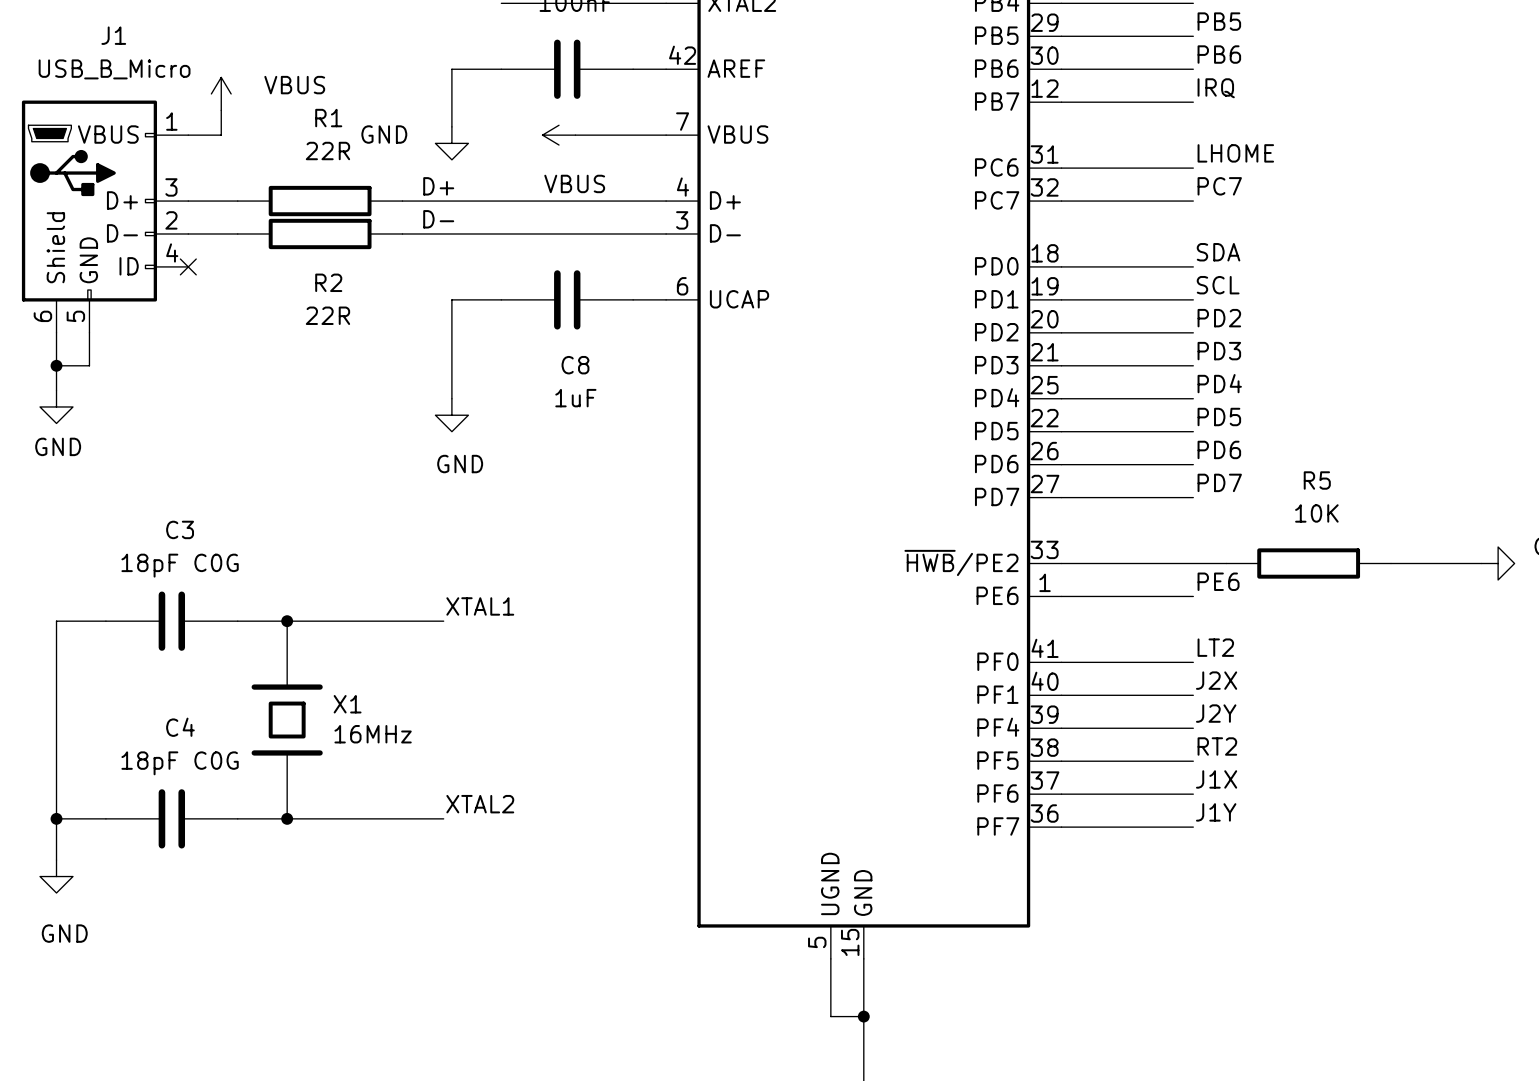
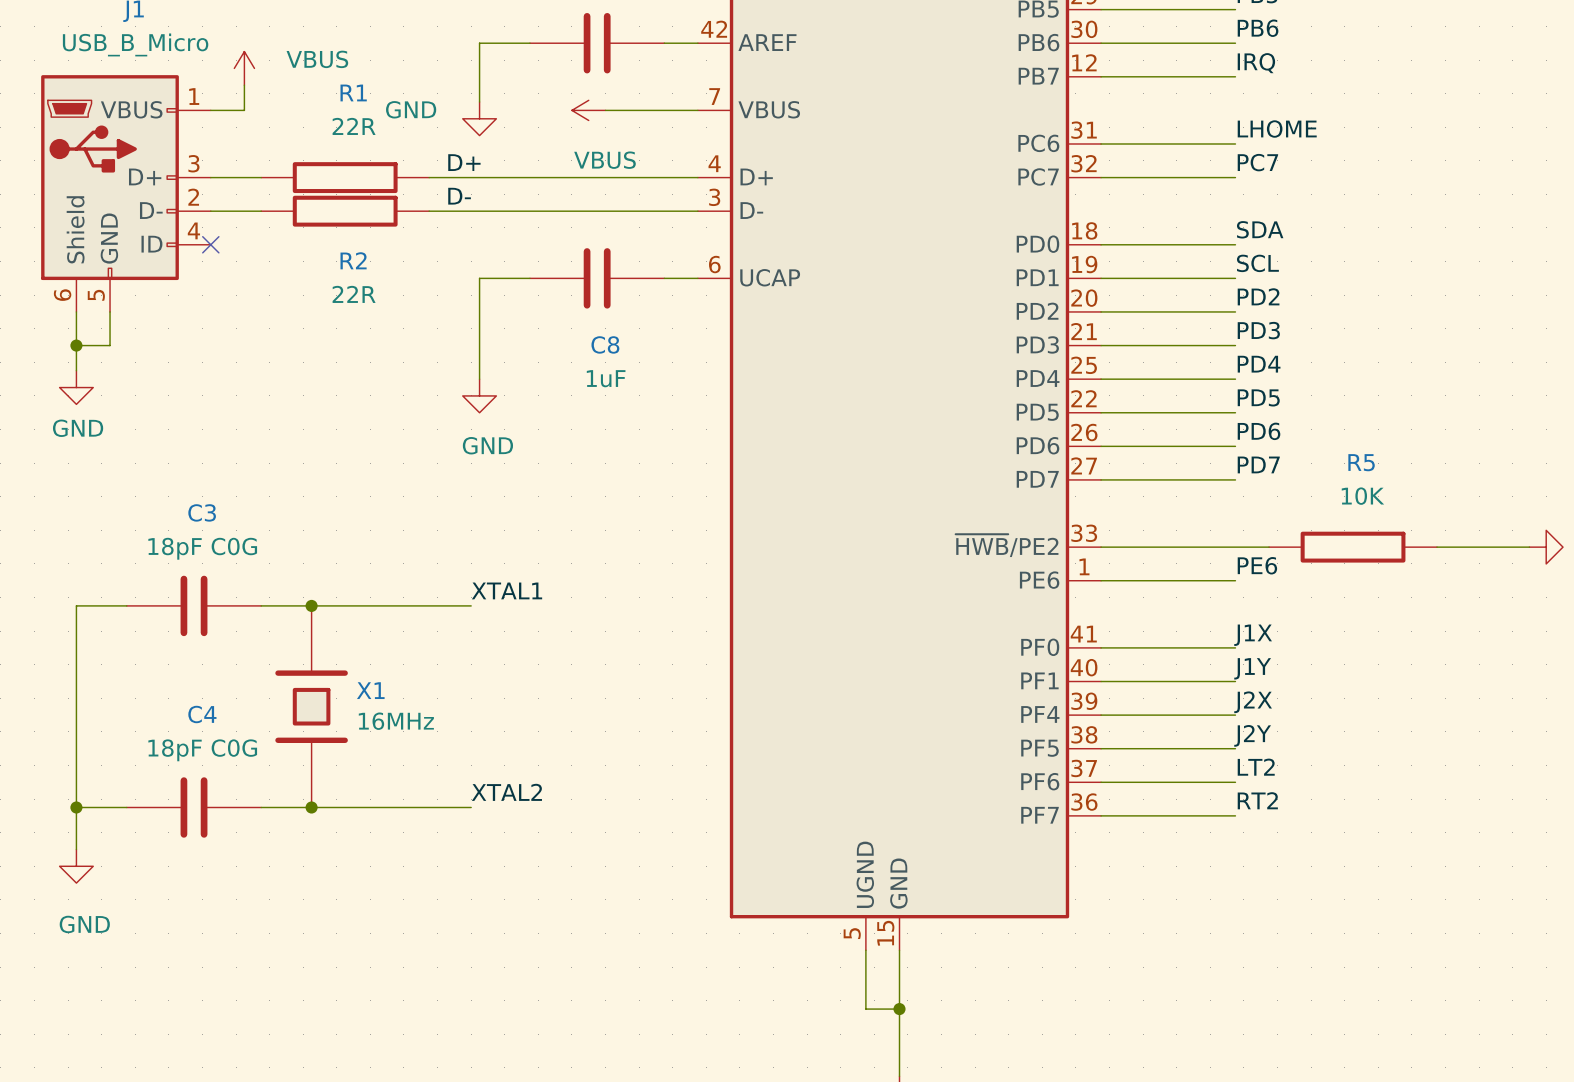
label: LT2 (1215, 647) -> J1X (1253, 635)
label: J2X (1216, 680) -> J1Y (1252, 668)
label: J2Y (1216, 713) -> J2X (1253, 702)
label: RT2 (1217, 746) -> J2Y (1252, 735)
label: J1X (1216, 779) -> LT2 (1256, 767)
label: J1Y (1216, 812) -> RT2 (1257, 800)

